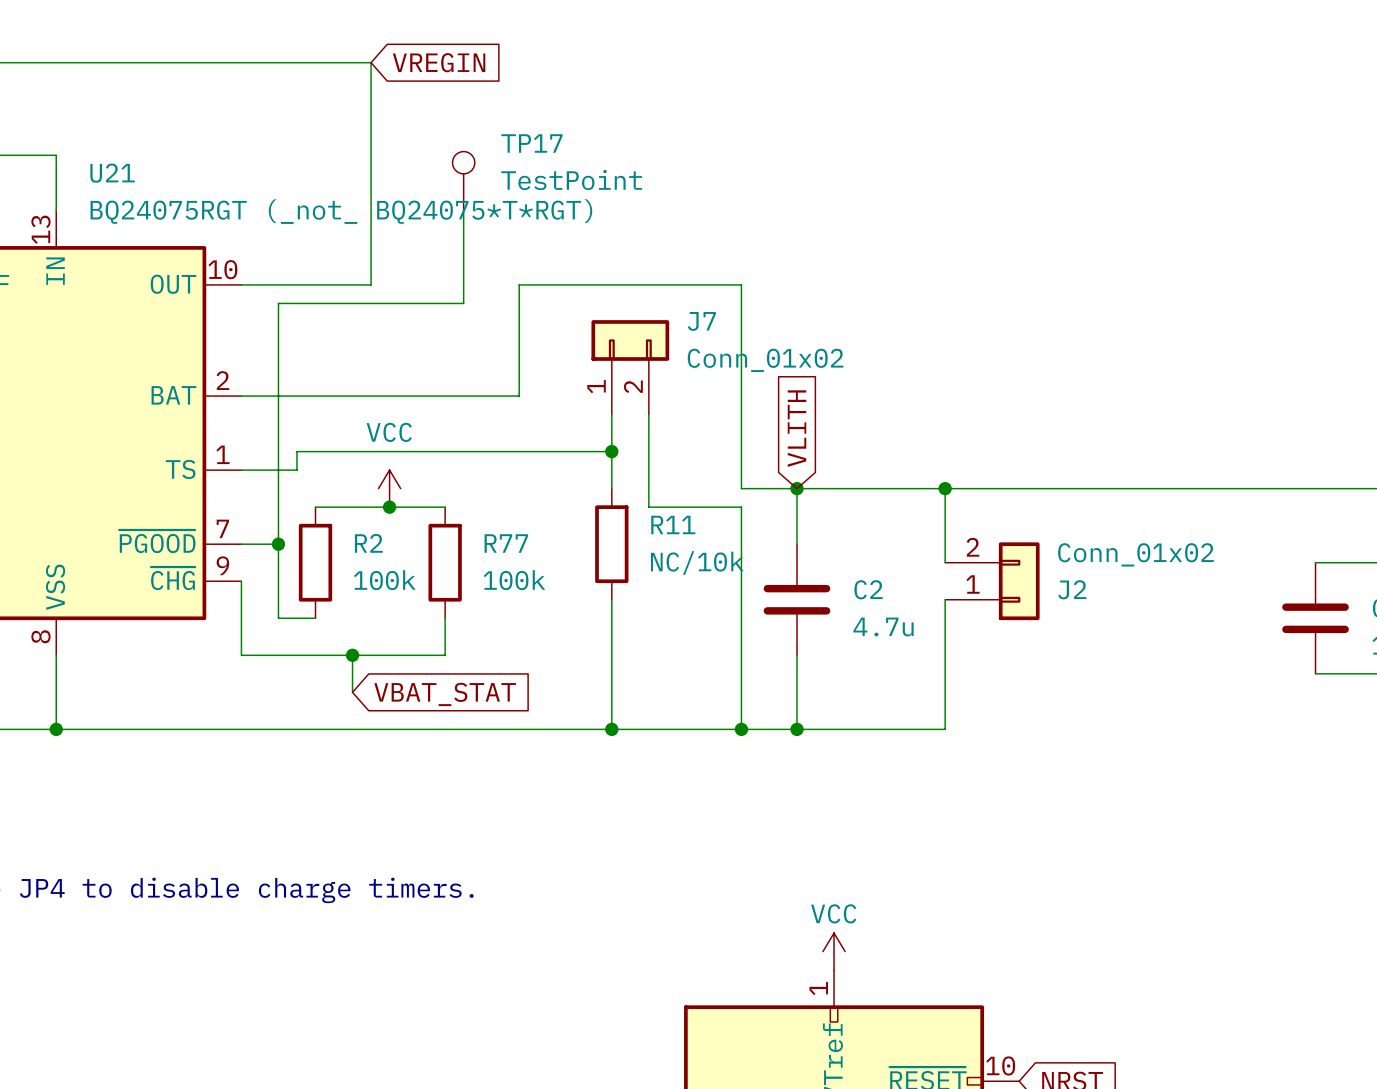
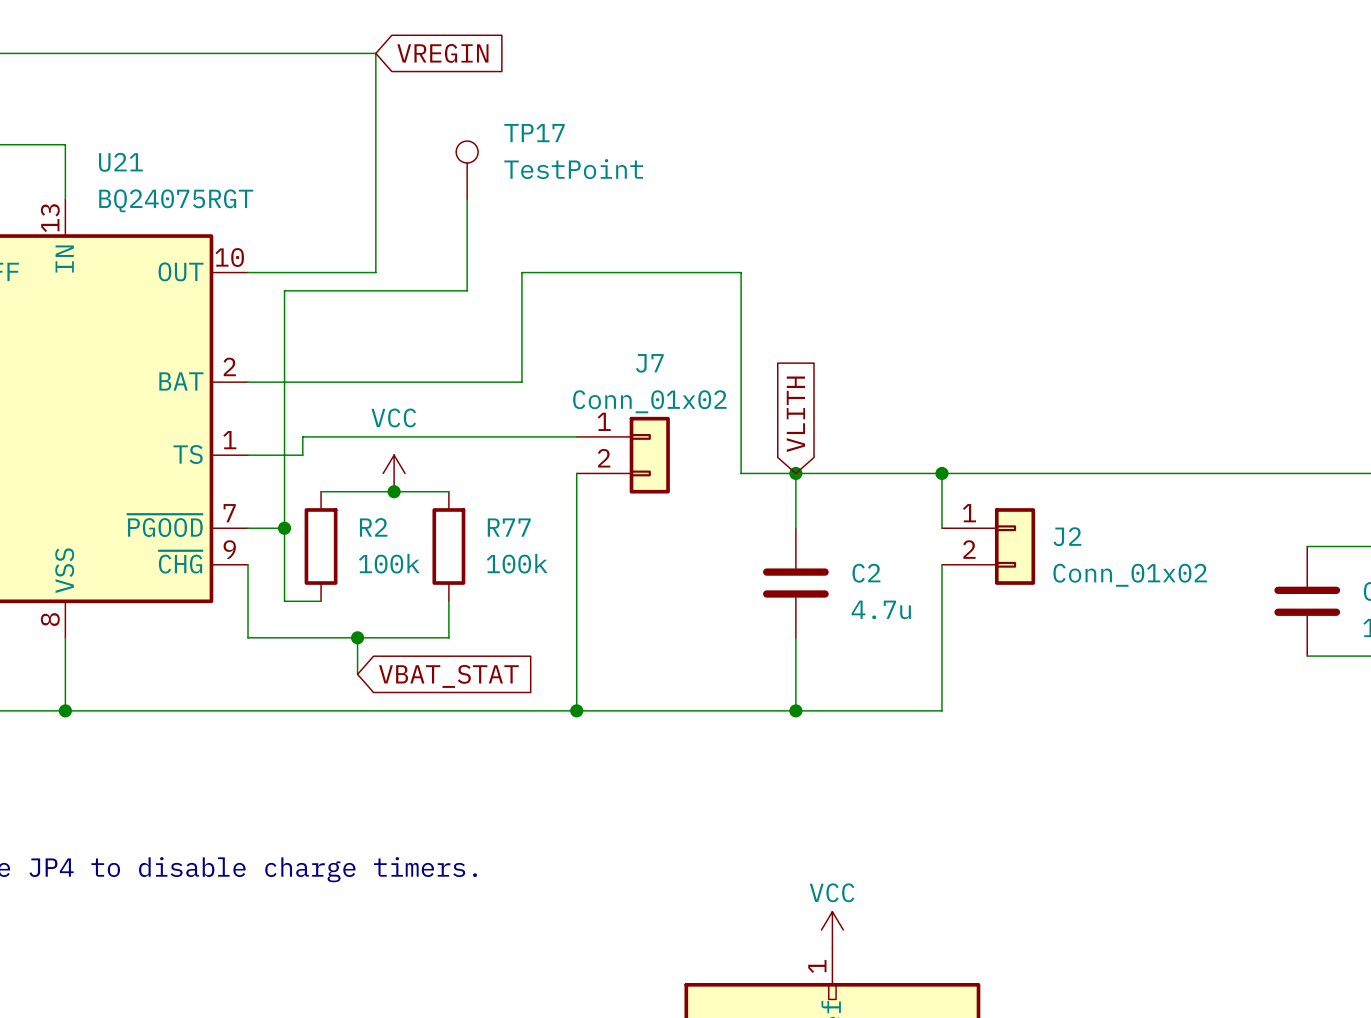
U21 value: BQ24075RGT (_not_ BQ24075*T*RGT) (341, 211) -> BQ24075RGT (176, 200)
J7 name position: J7 (701, 321) -> J7 (649, 363)
J7 rotation: 0° (630, 340) -> 90° clockwise (649, 455)
J7 value position: Conn_01x02 (765, 360) -> Conn_01x02 (649, 401)
J7 position: (630, 367) -> (623, 455)
wire: (611, 414) (611, 488) -> none
wire: (648, 414) (648, 507) (741, 507) (741, 729) -> none
junction: (611, 451) -> none
wire: none -> (576, 473) (576, 710)
R11: NC/10k (611, 544) -> none
wire: (945, 544) (945, 562) -> (941, 564) (941, 583)
J2 flip: as is (1019, 581) -> up-down (1015, 546)
wire: (611, 599) (611, 729) -> none
junction position: (611, 729) -> (576, 710)
junction: (741, 729) -> none

